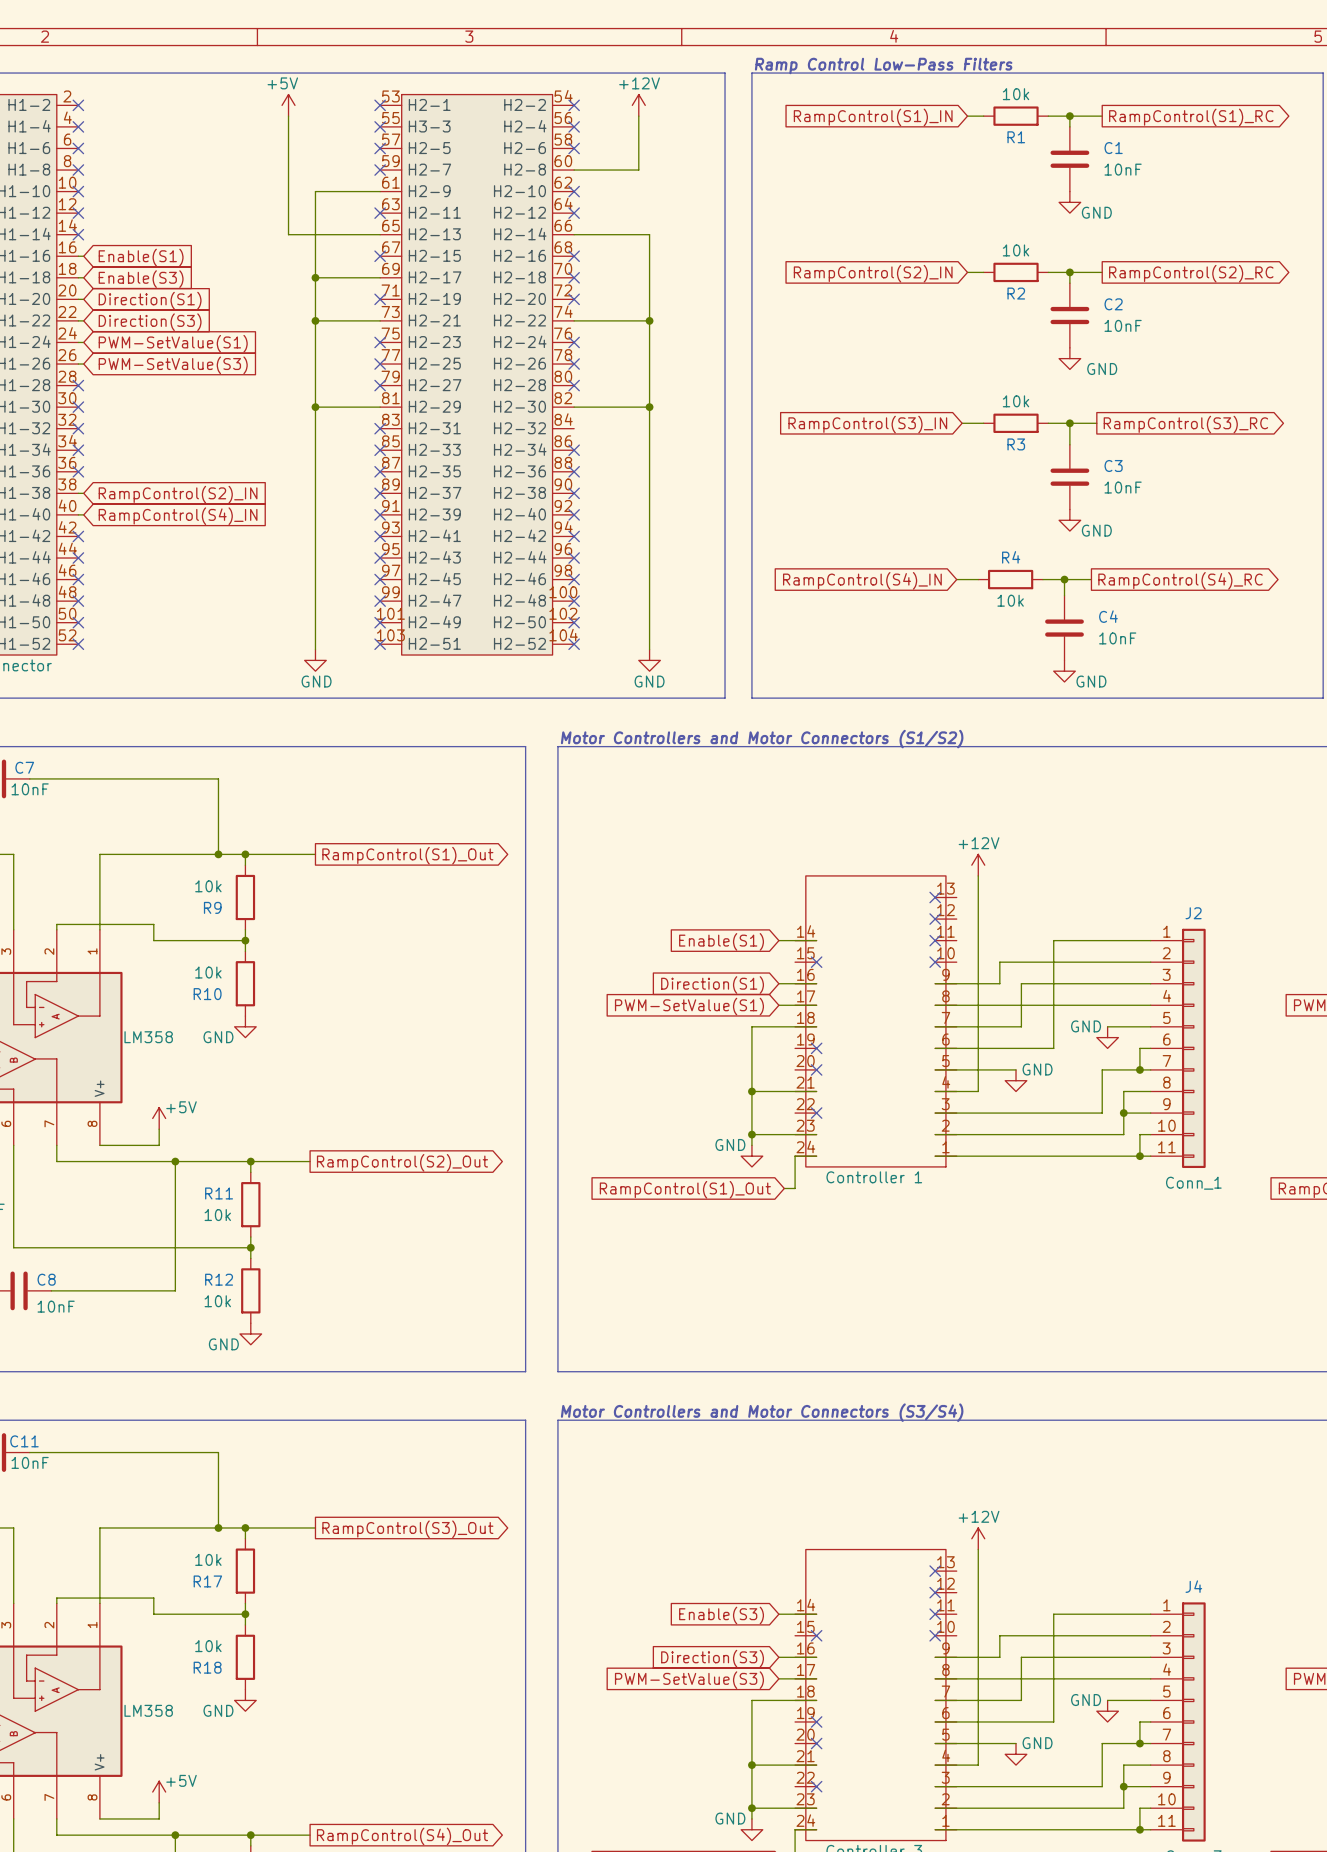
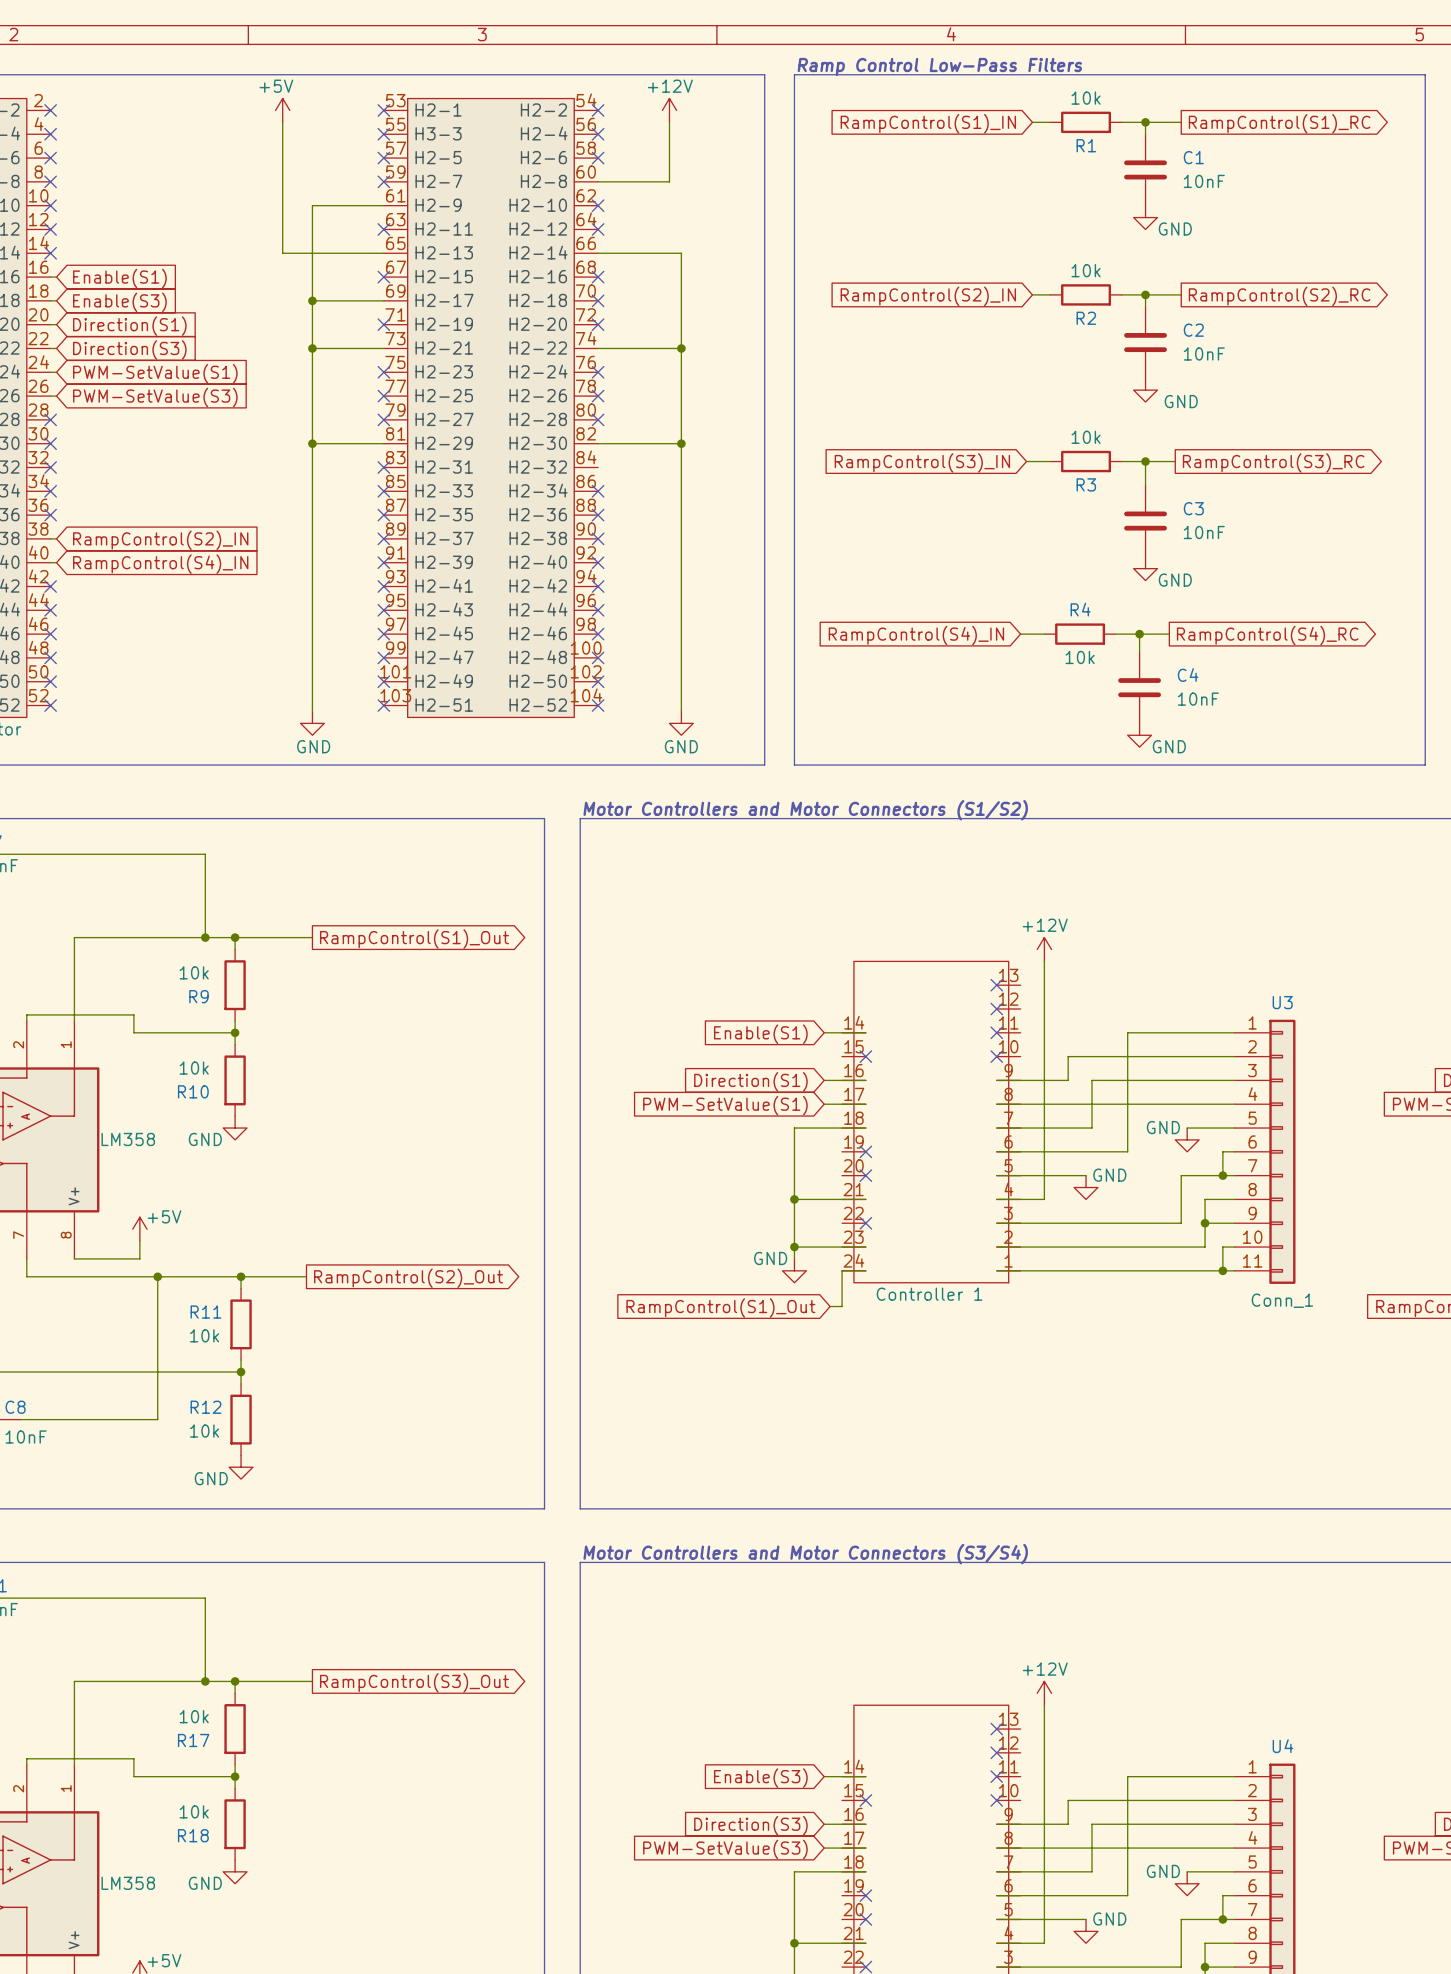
J2 name: J2 (1193, 913) -> U3 (1282, 1002)
J4 name: J4 (1193, 1586) -> U4 (1282, 1746)

